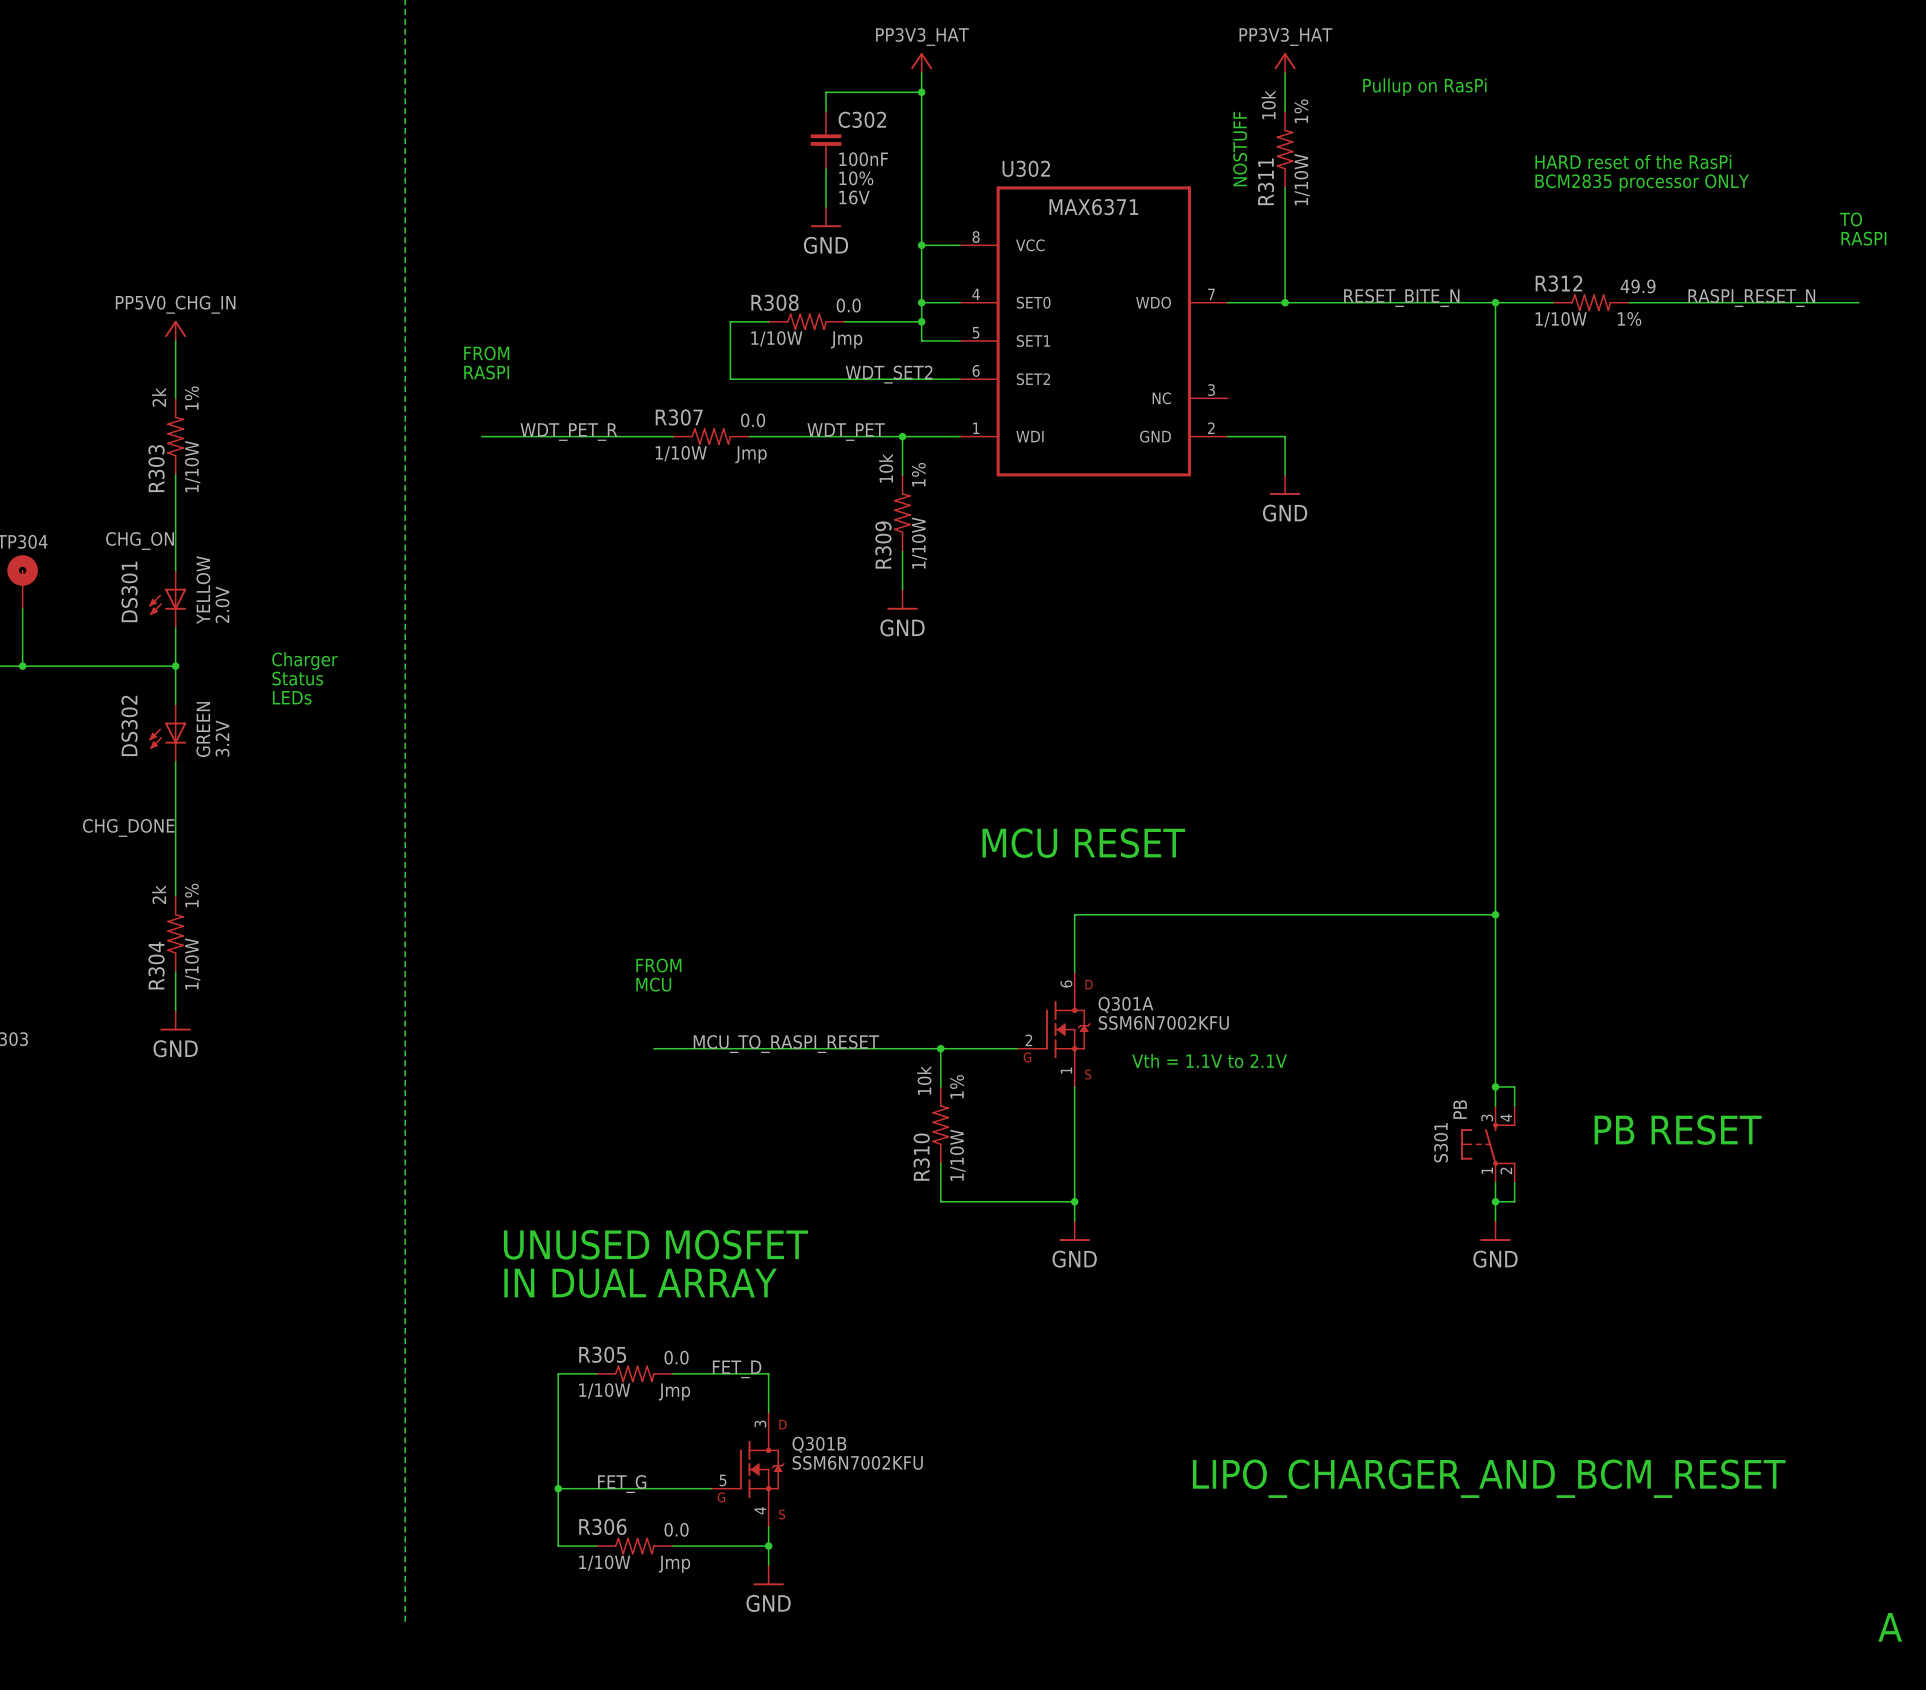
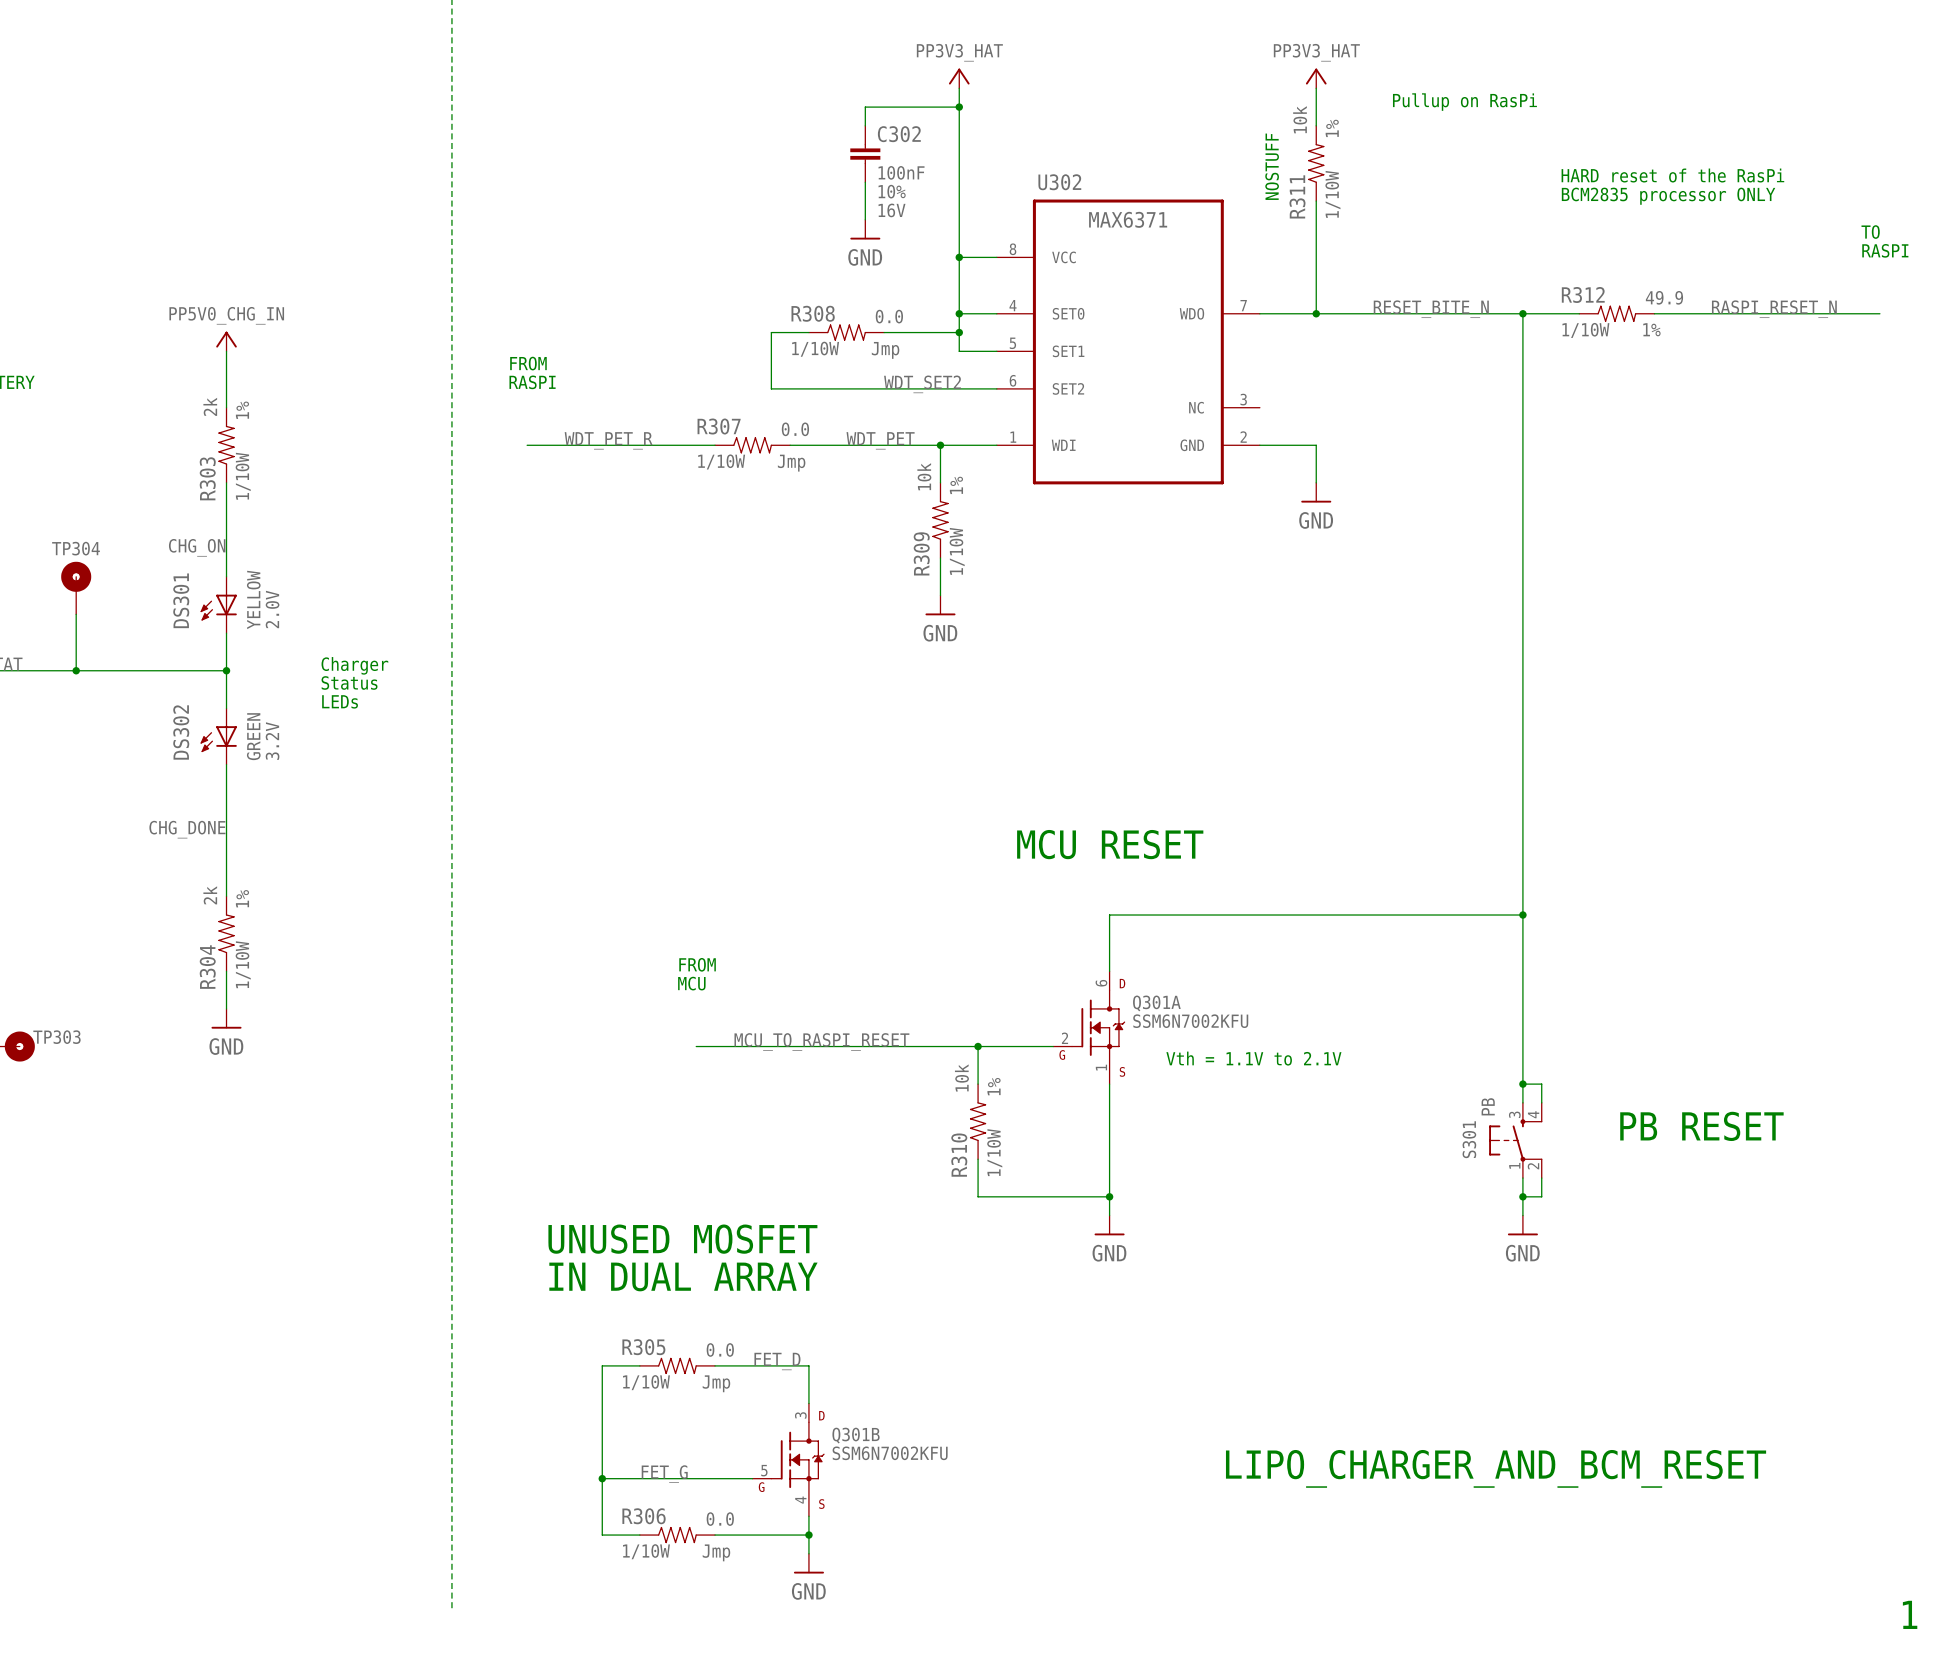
text: A (1890, 1627) -> 1 (1910, 1614)

